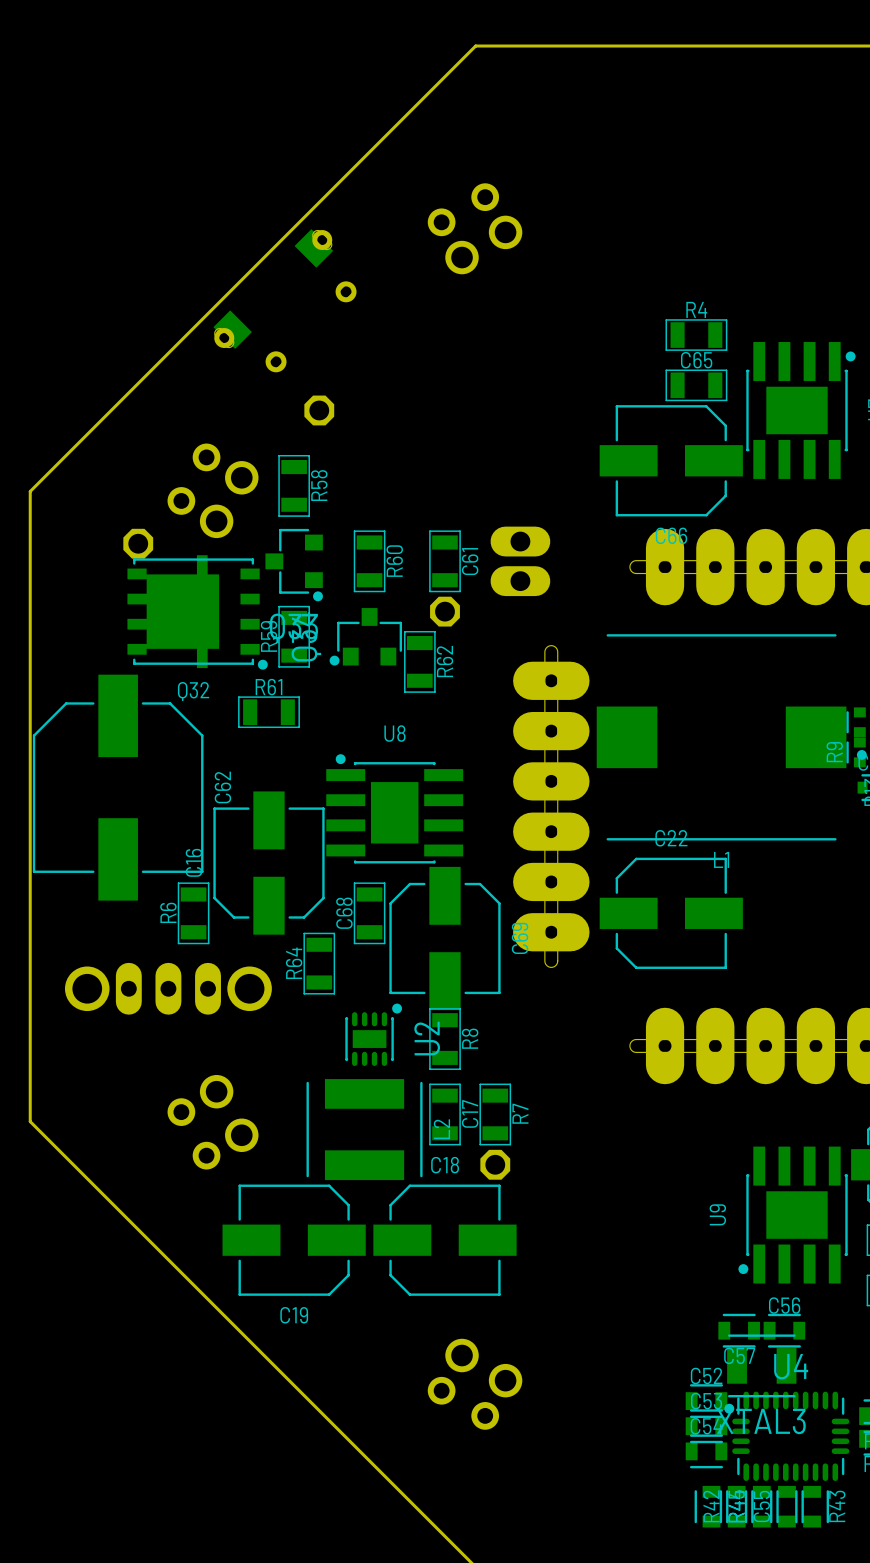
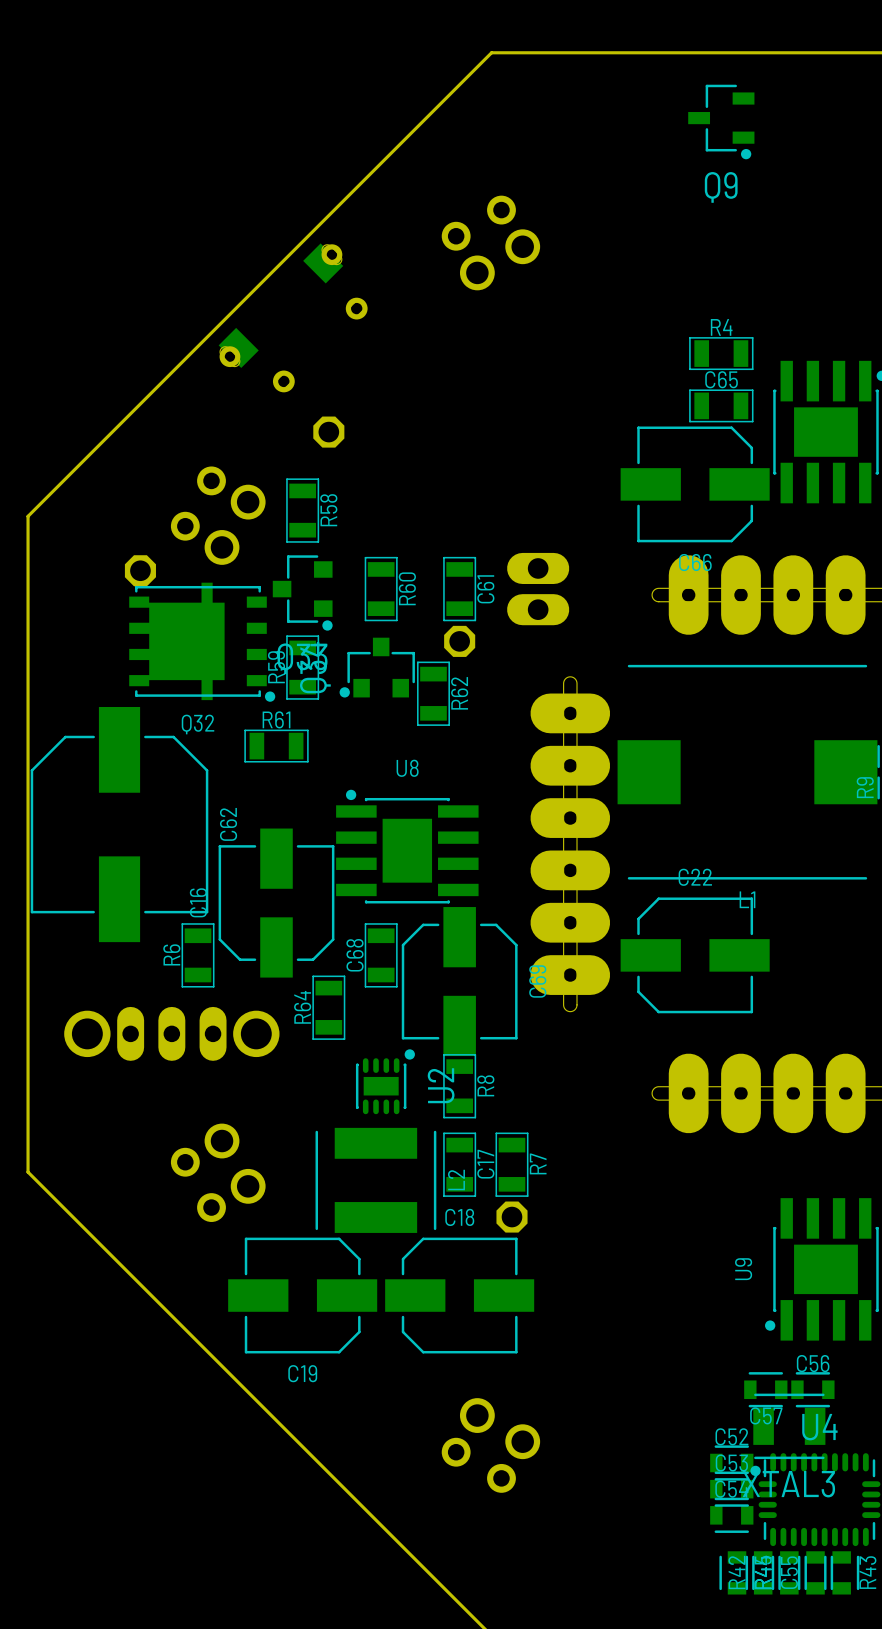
Q9: none -> (721, 122)

